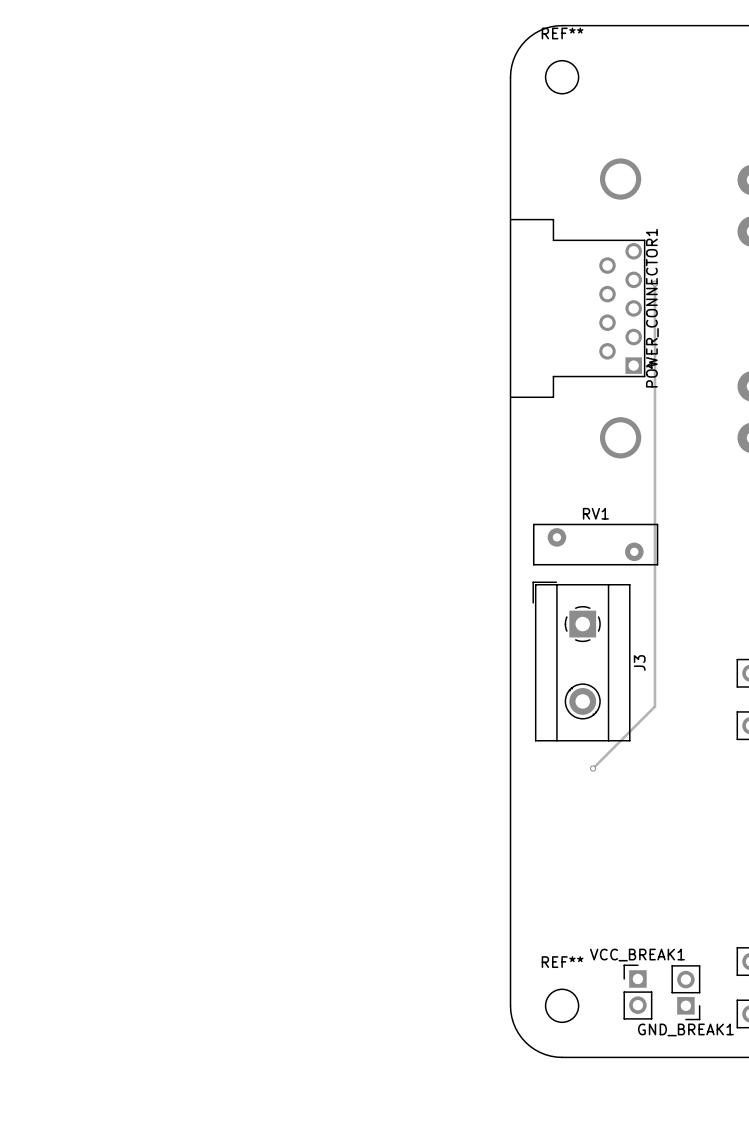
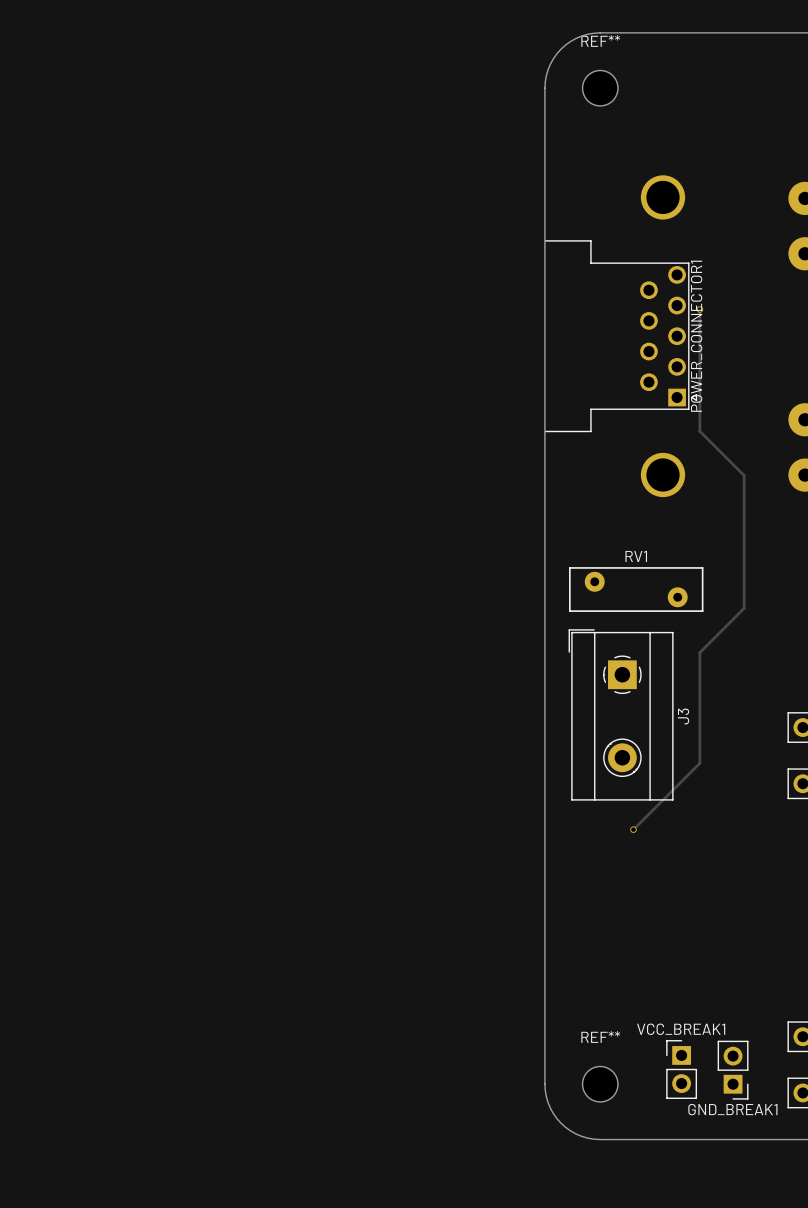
track: (654, 397) (654, 603) -> (699, 431) (744, 475) (744, 608) (699, 652)

